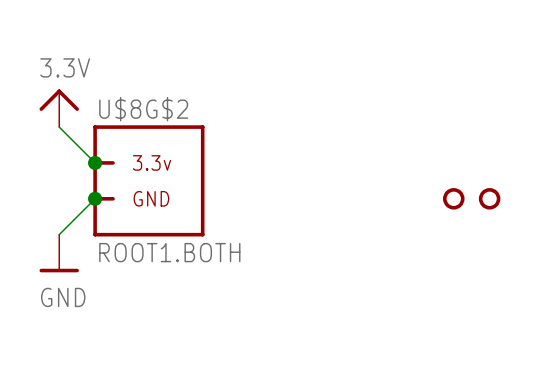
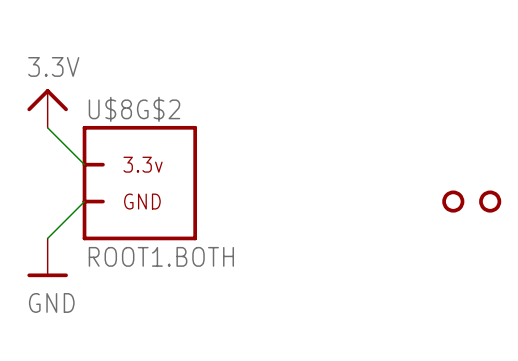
junction: (95, 162) -> none
junction: (95, 198) -> none

